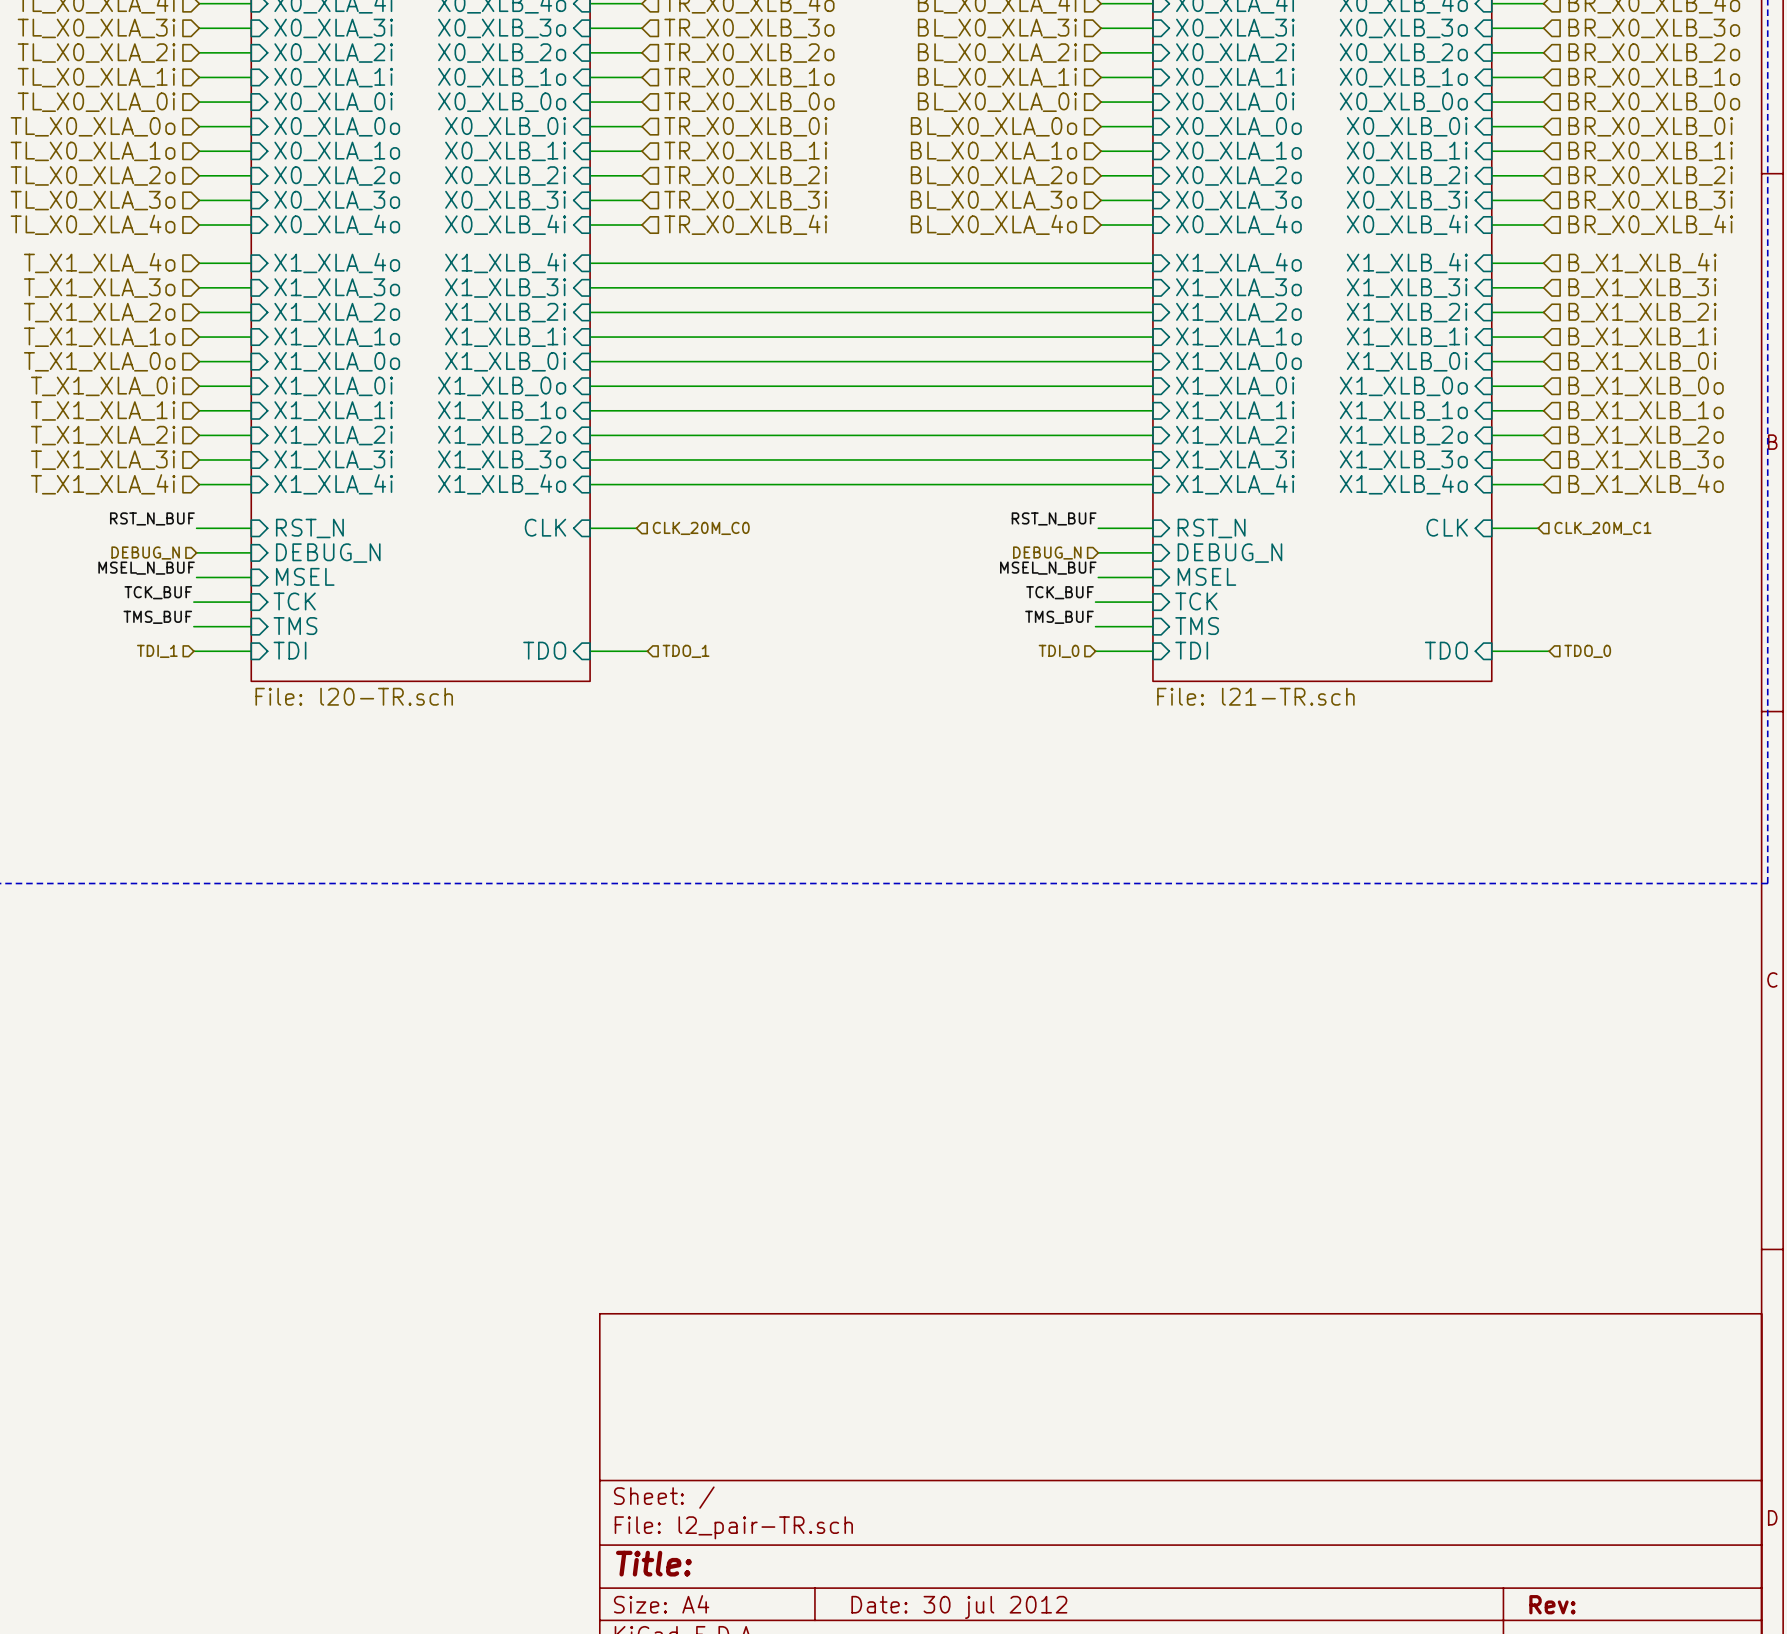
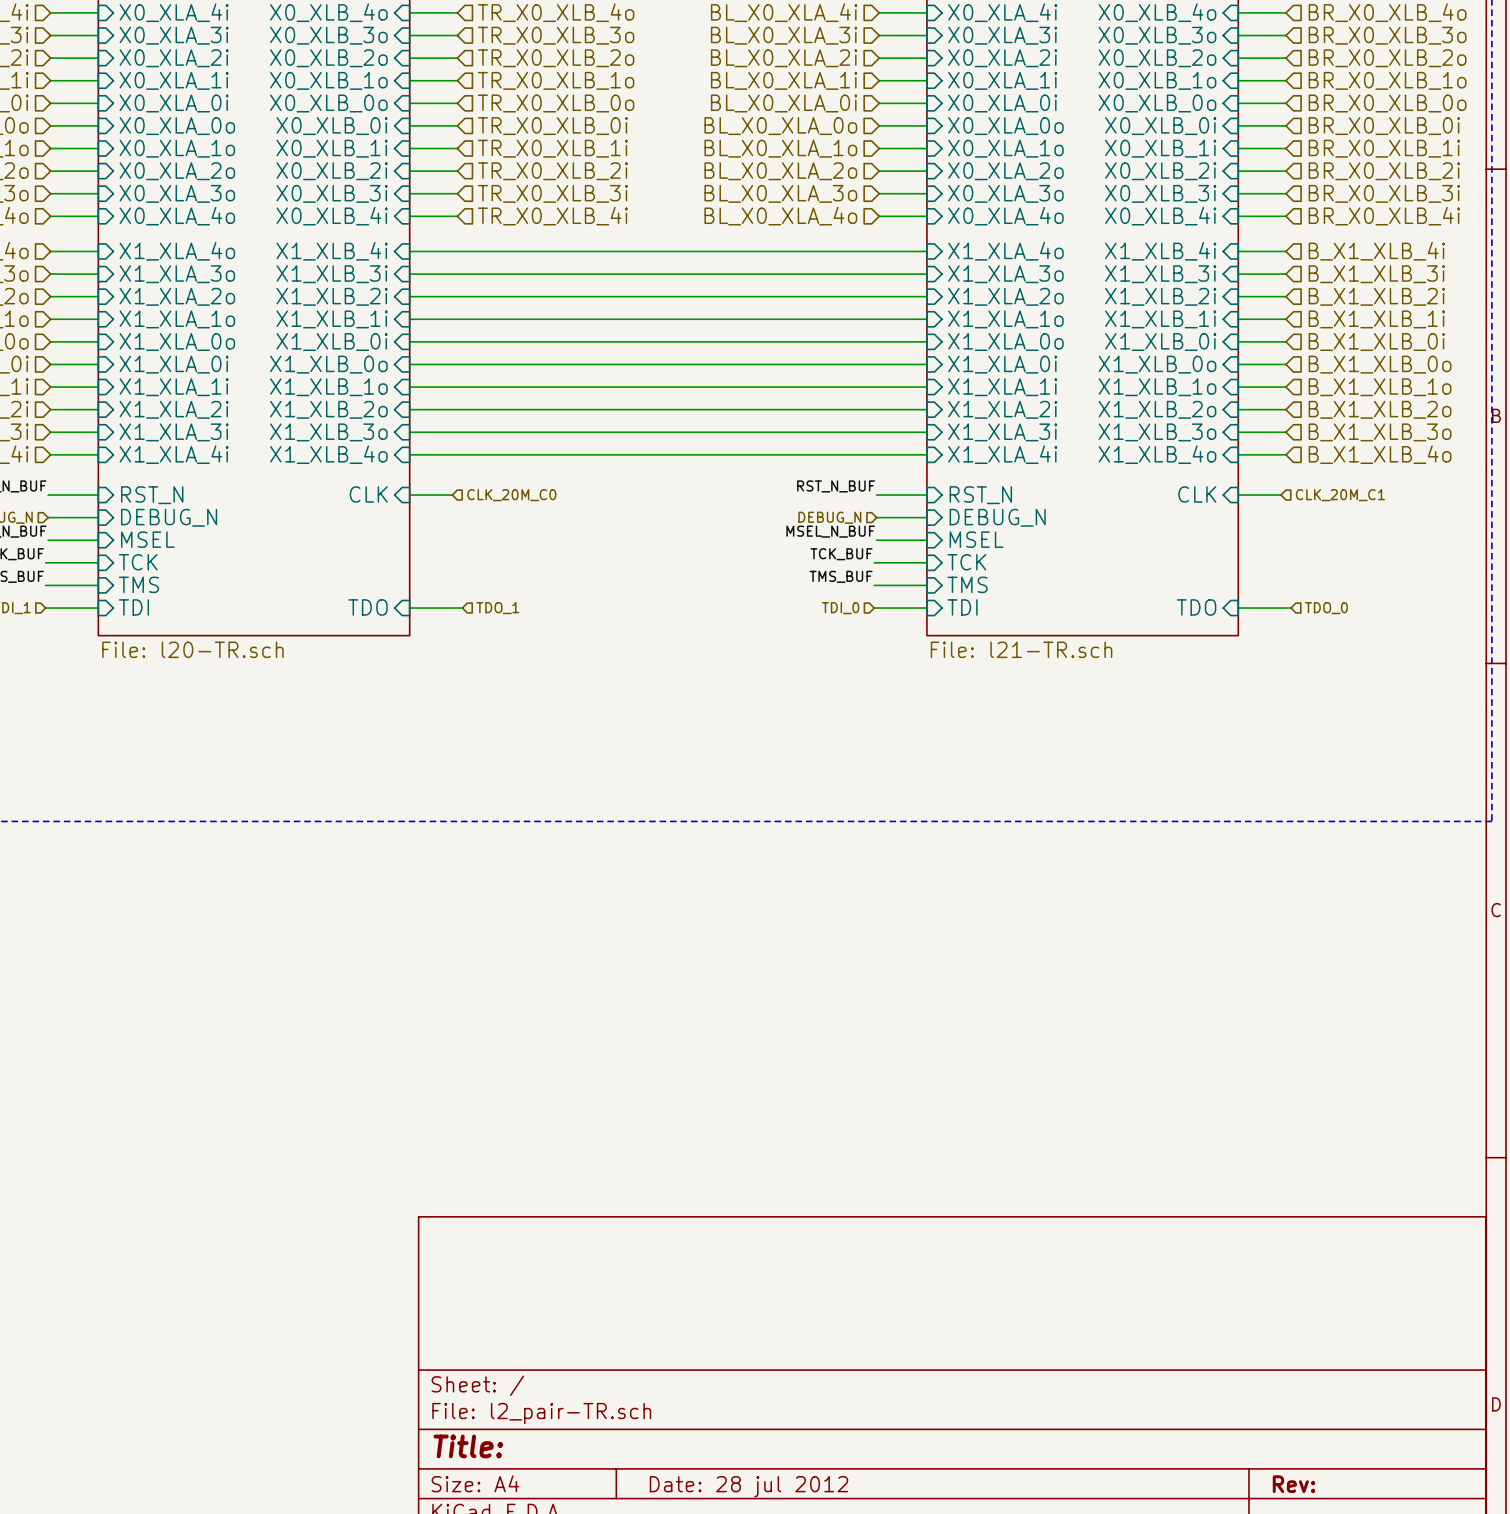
title block: Date: 30 jul 2012 (959, 1607) -> Date: 28 jul 2012 (749, 1486)

